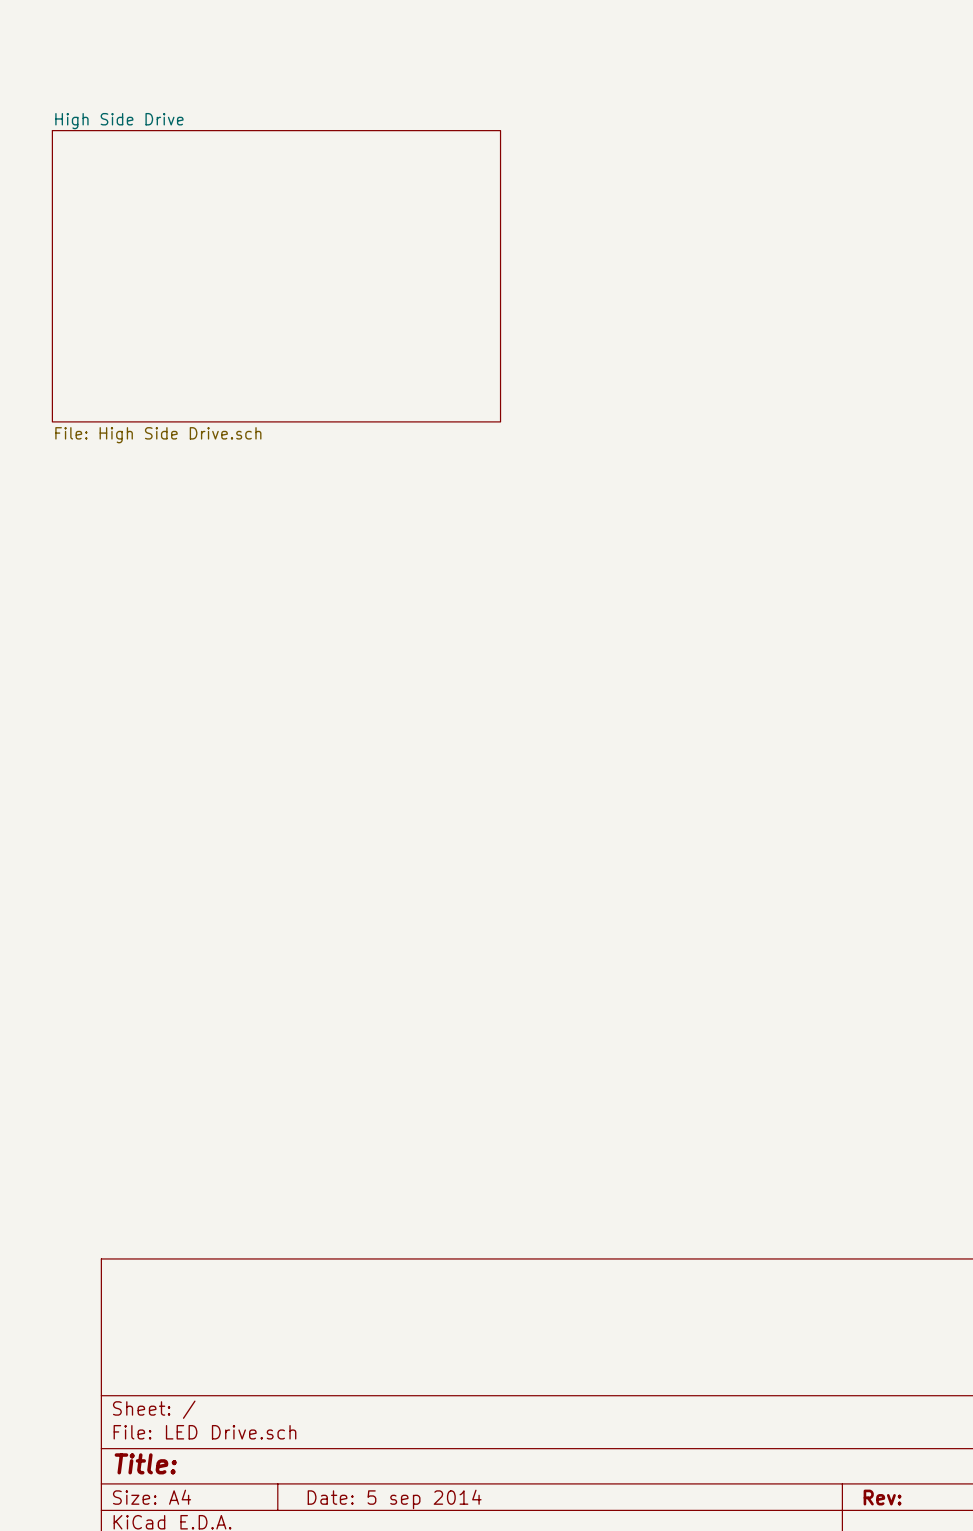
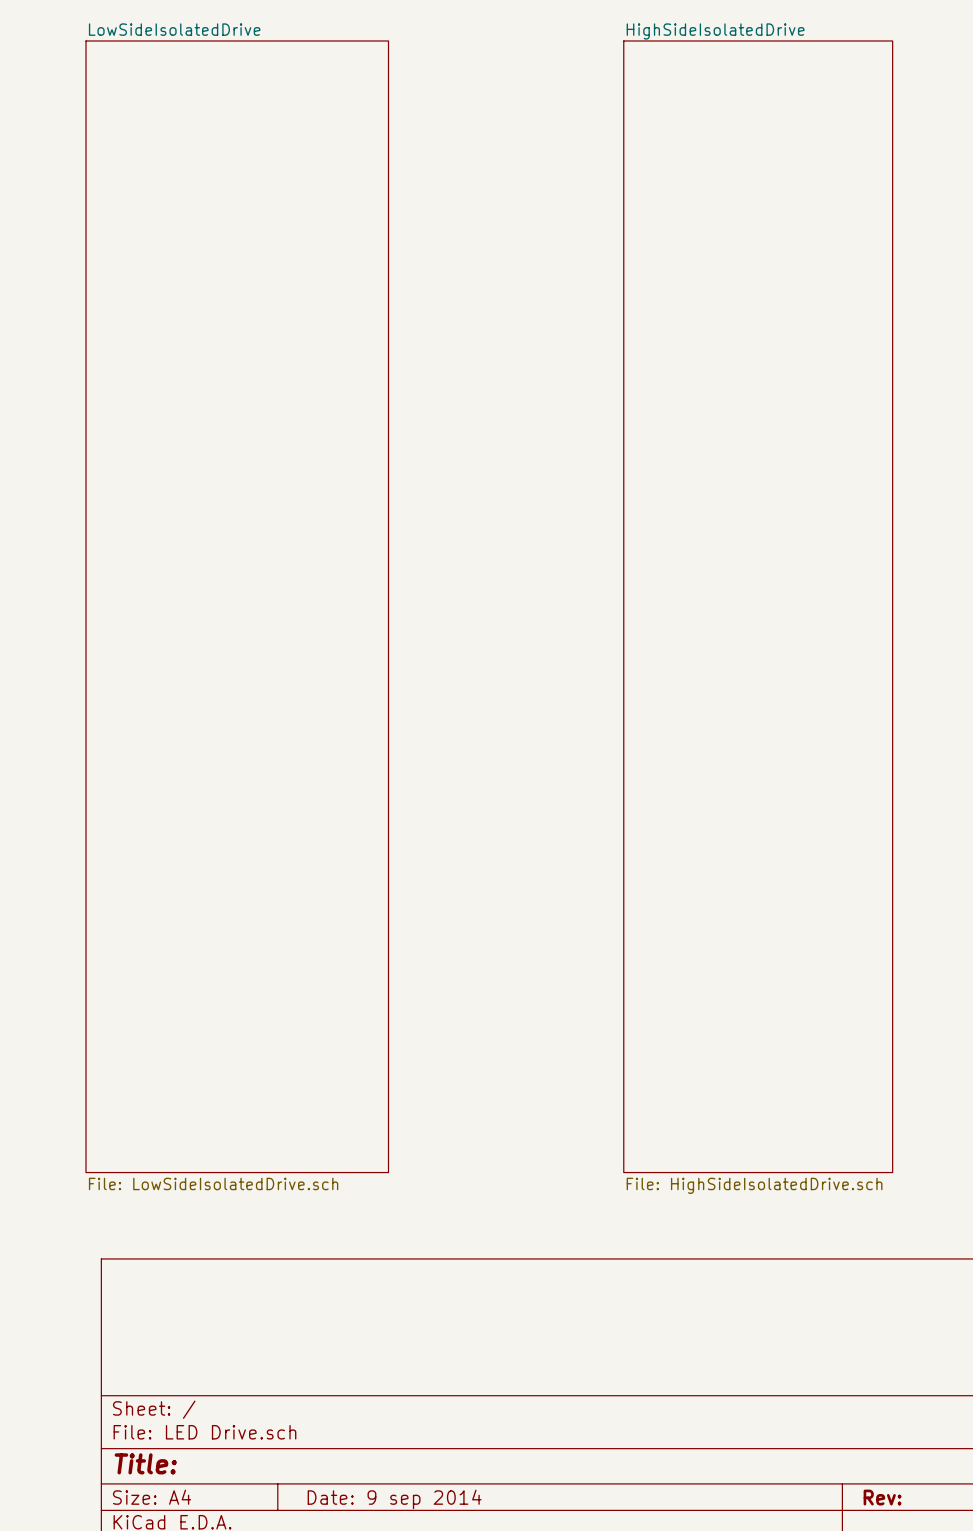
sheet High Side Drive: File: High Side Drive.sch (276, 276) -> none
sheet LowSideIsolatedDrive: none -> File: LowSideIsolatedDrive.sch (237, 606)
sheet HighSideIsolatedDrive: none -> File: HighSideIsolatedDrive.sch (758, 606)
title block: Date: 5 sep 2014 (394, 1499) -> Date: 9 sep 2014 (394, 1499)

